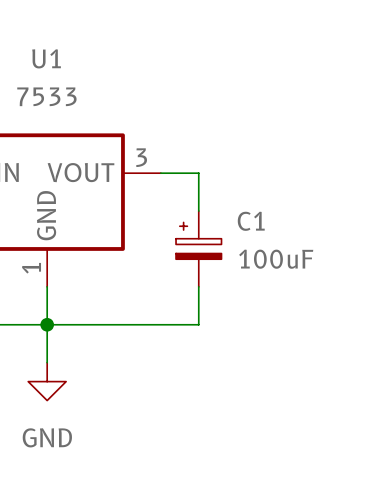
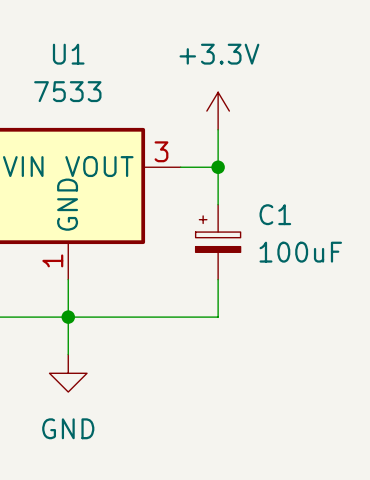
power symbol: none -> +3.3V (218, 111)
wire: none -> (218, 129) (218, 167)
junction: none -> (218, 167)

